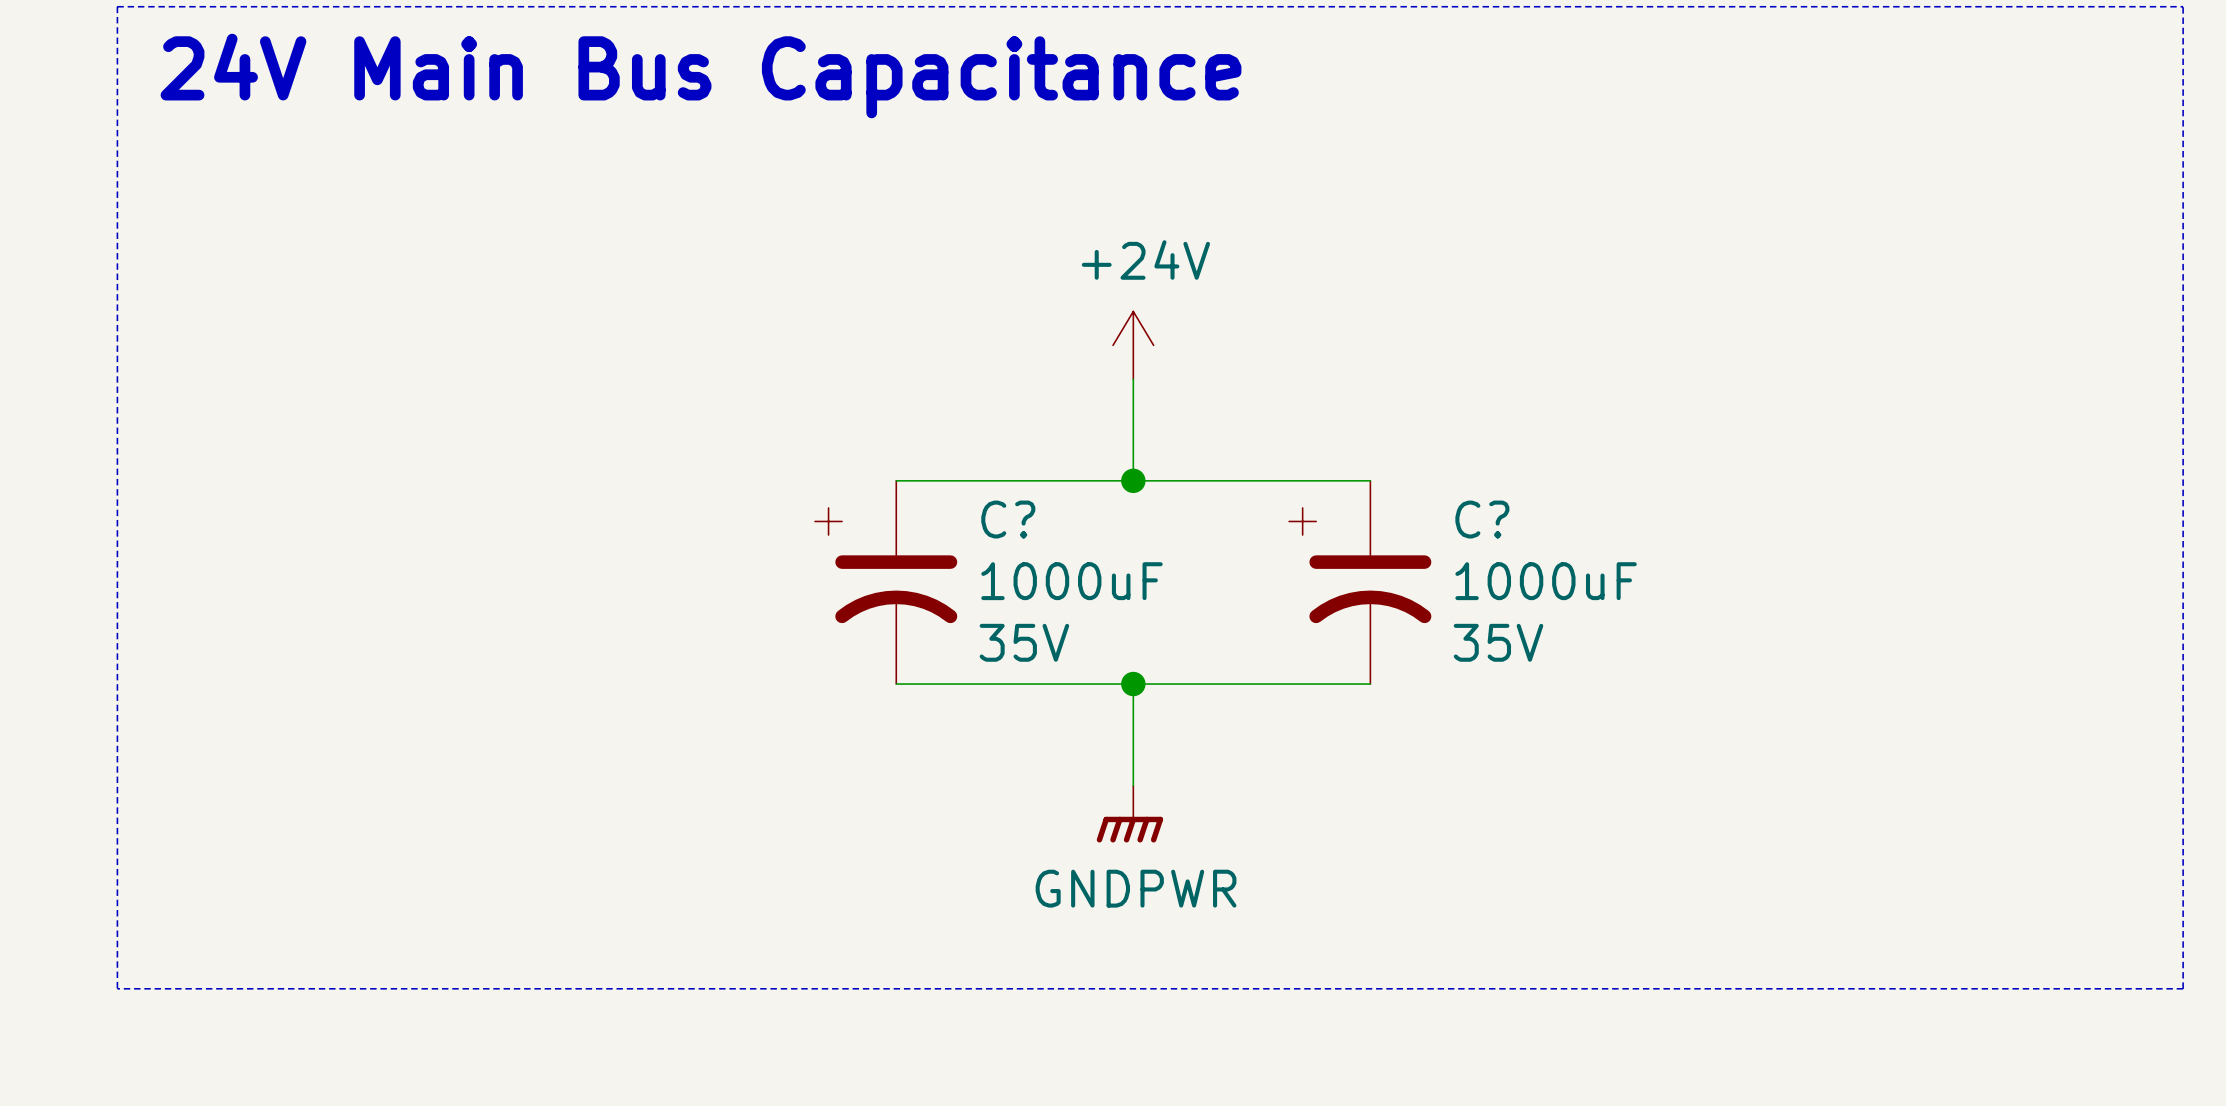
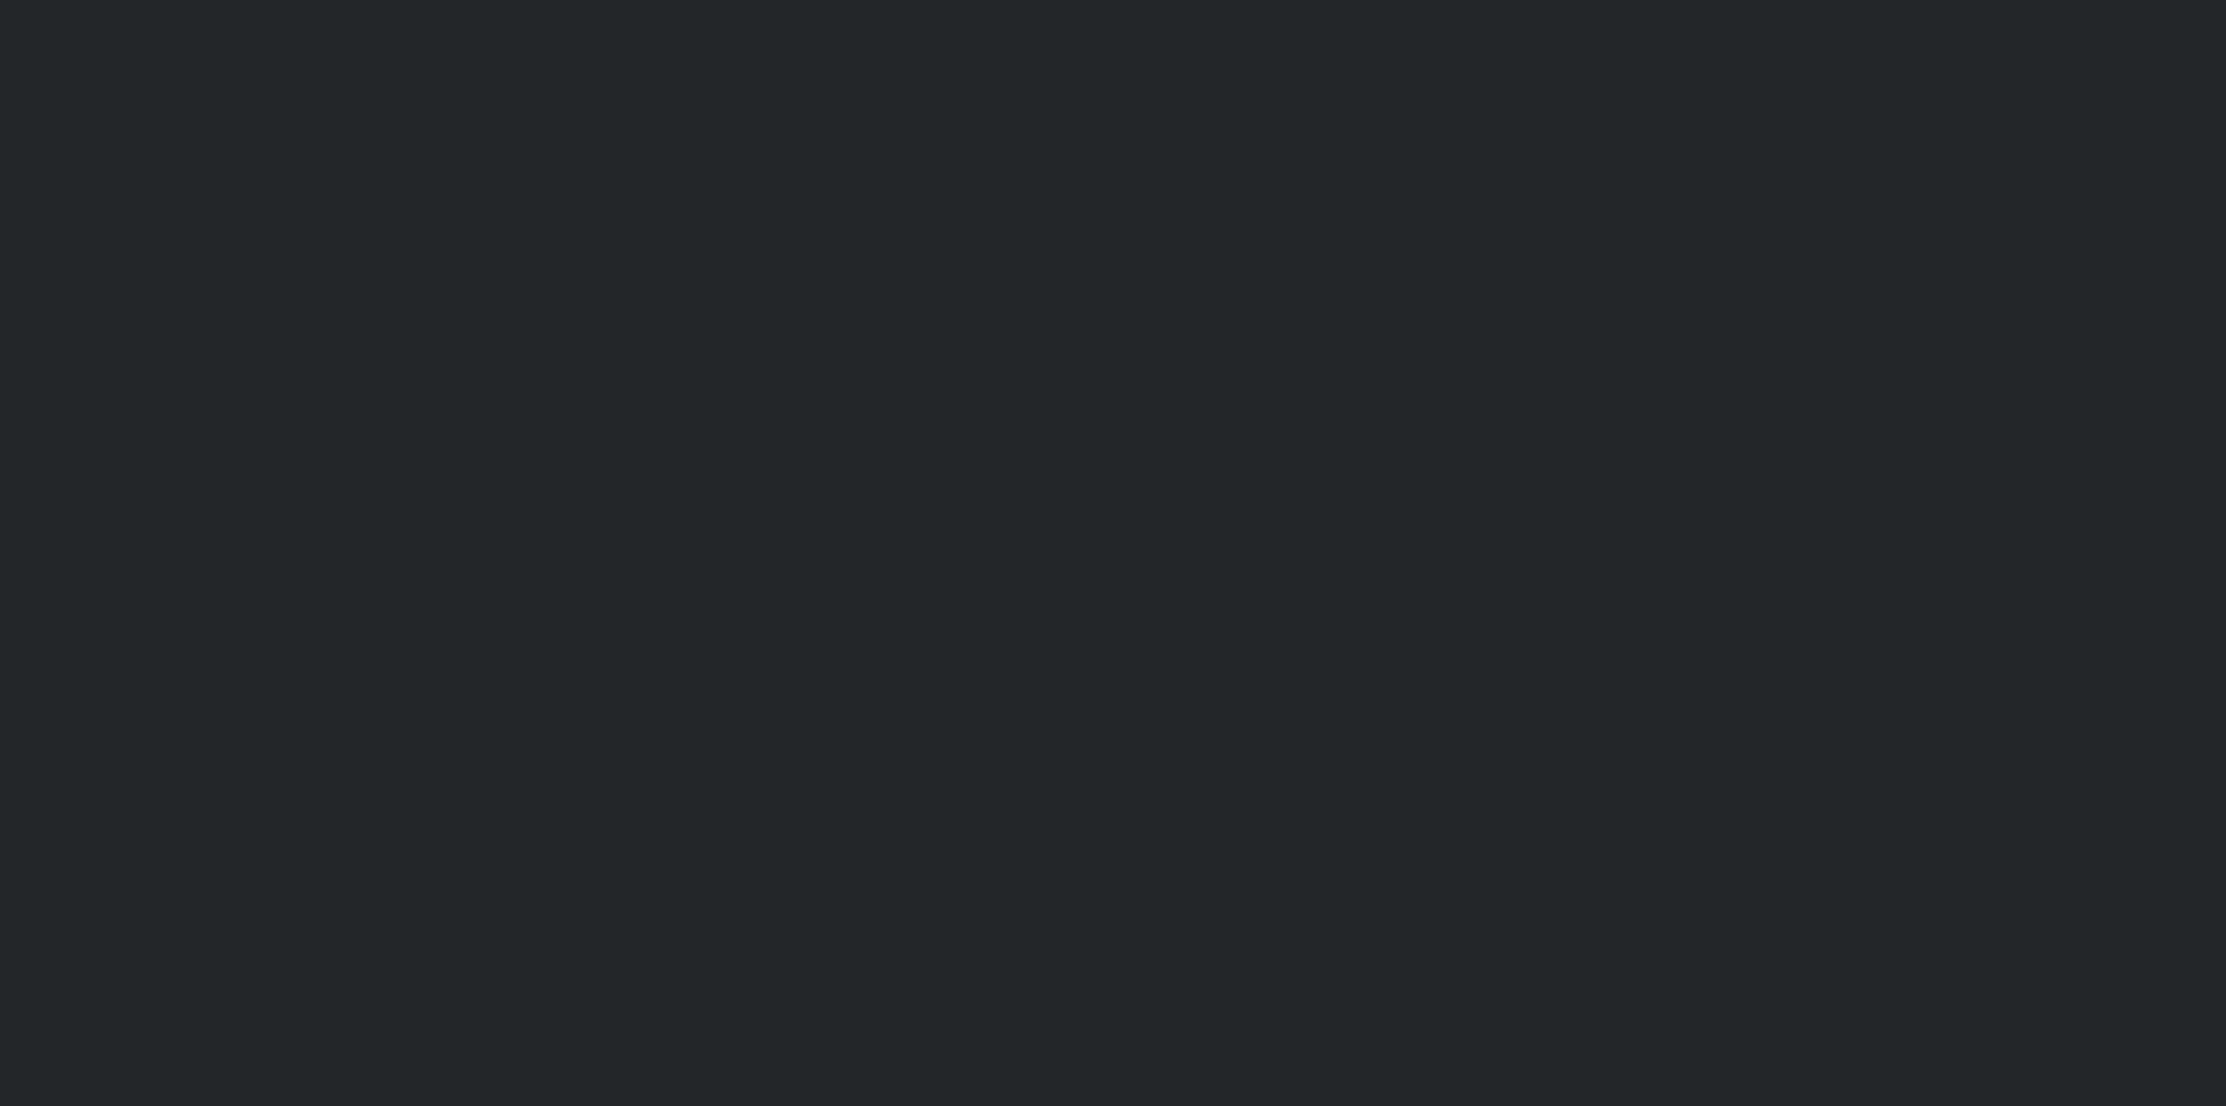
line: (117, 6) (2183, 6) (2183, 988) (117, 988) (117, 6) -> none
text: 24V Main Bus Capacitance (701, 76) -> none
power symbol: +24V (1133, 345) -> none
wire: (1133, 379) (1133, 480) -> none
wire: (896, 480) (1370, 480) -> none
junction: (1133, 480) -> none
C?: (886, 582) -> none
C?: (1360, 582) -> none
wire: (896, 684) (1370, 684) -> none
wire: (1133, 684) (1133, 785) -> none
junction: (1133, 684) -> none
power symbol: GNDPWR (1129, 814) -> none

